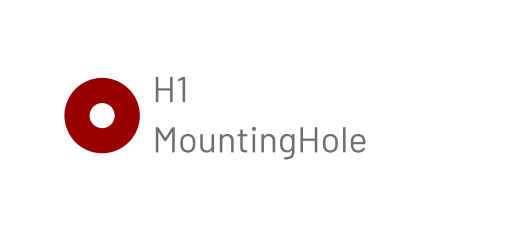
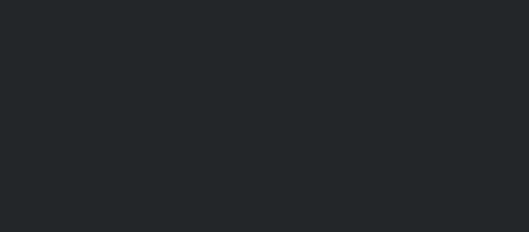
H1: MountingHole (102, 115) -> none

